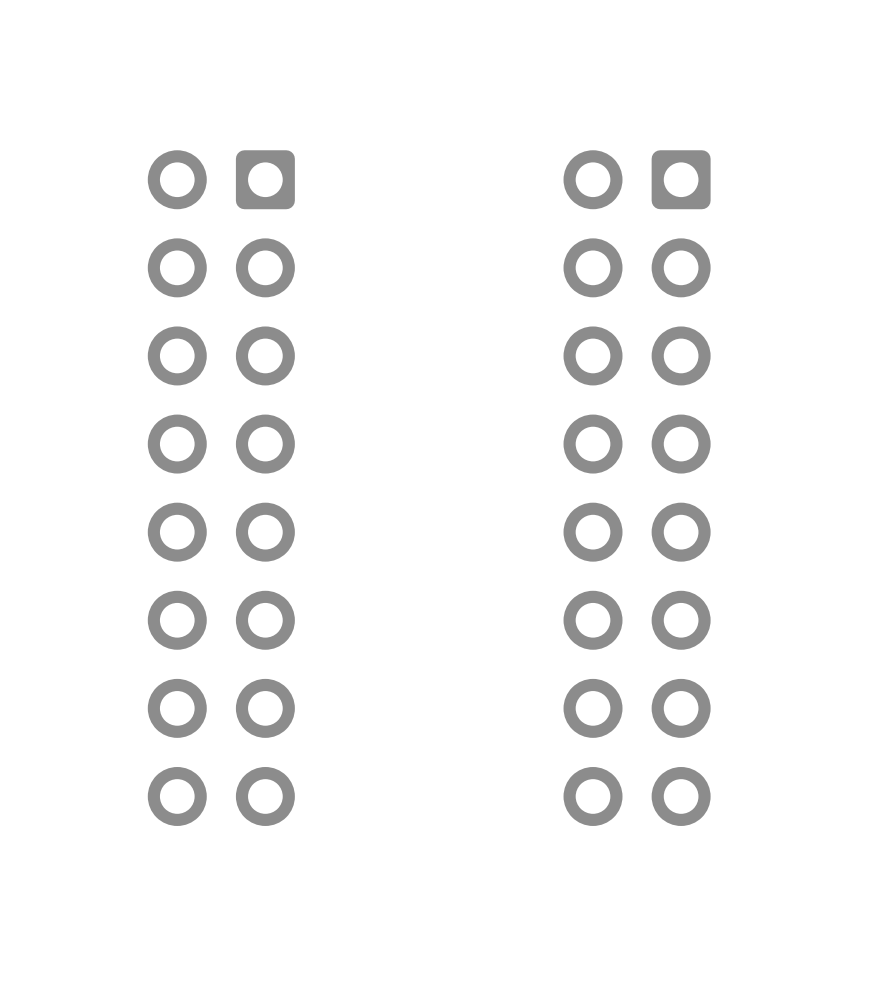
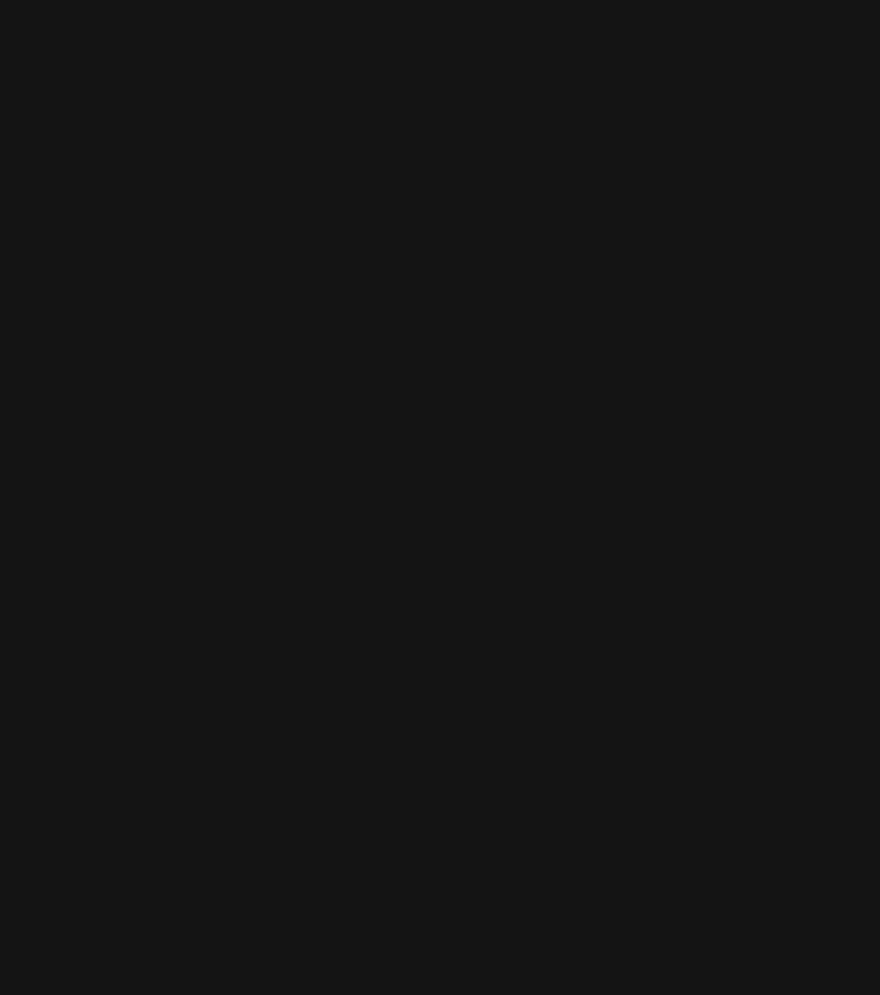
part: (221, 488) -> none
part: (637, 488) -> none

